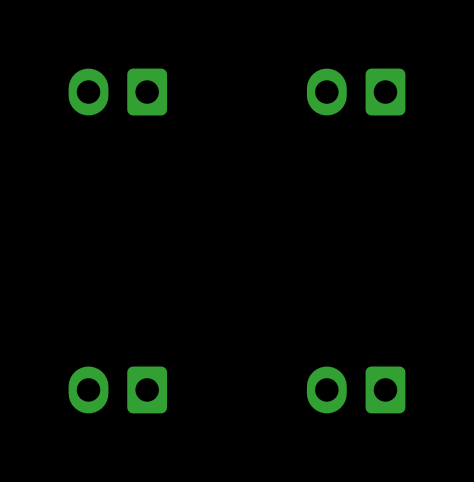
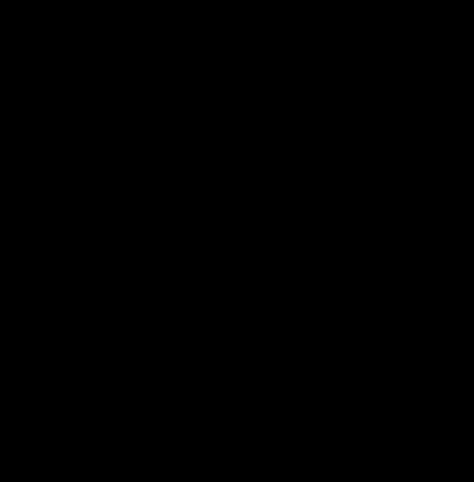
part: (117, 92) -> none
part: (356, 92) -> none
part: (117, 389) -> none
part: (356, 389) -> none

